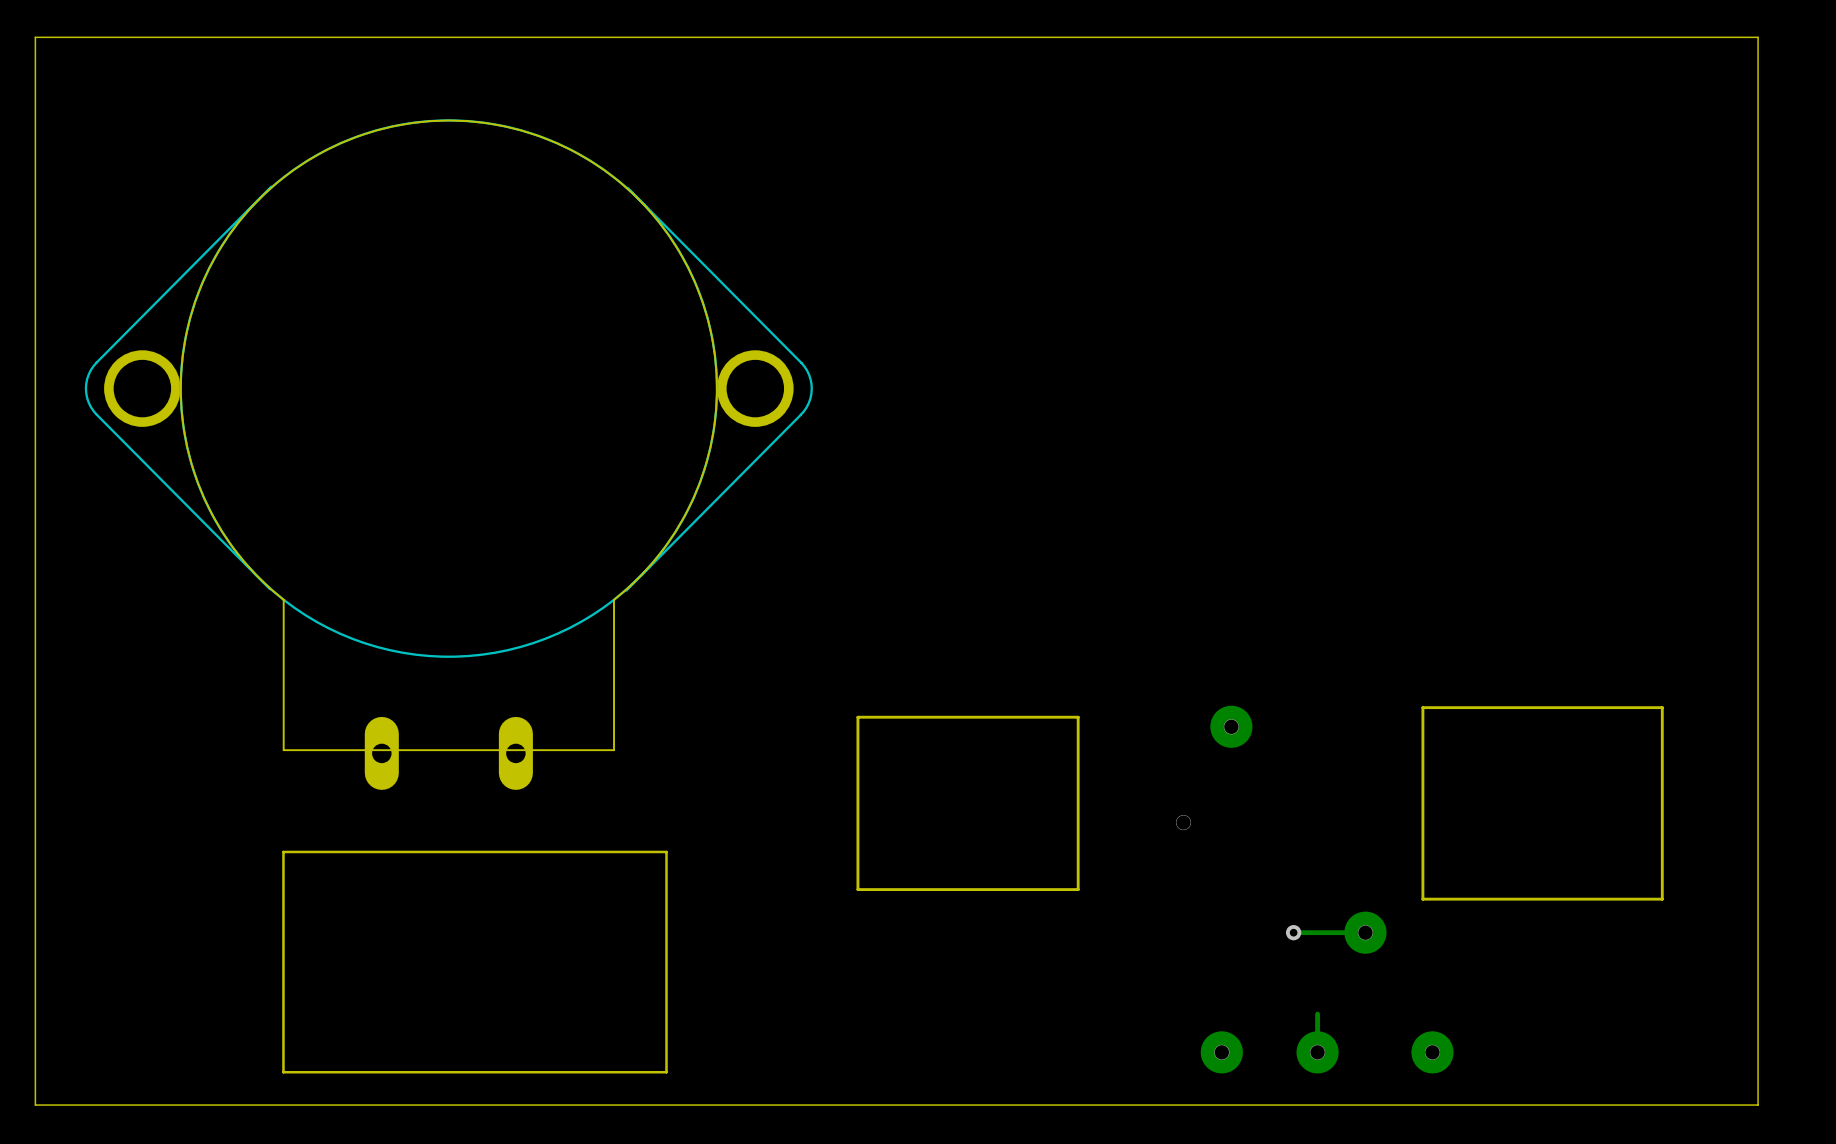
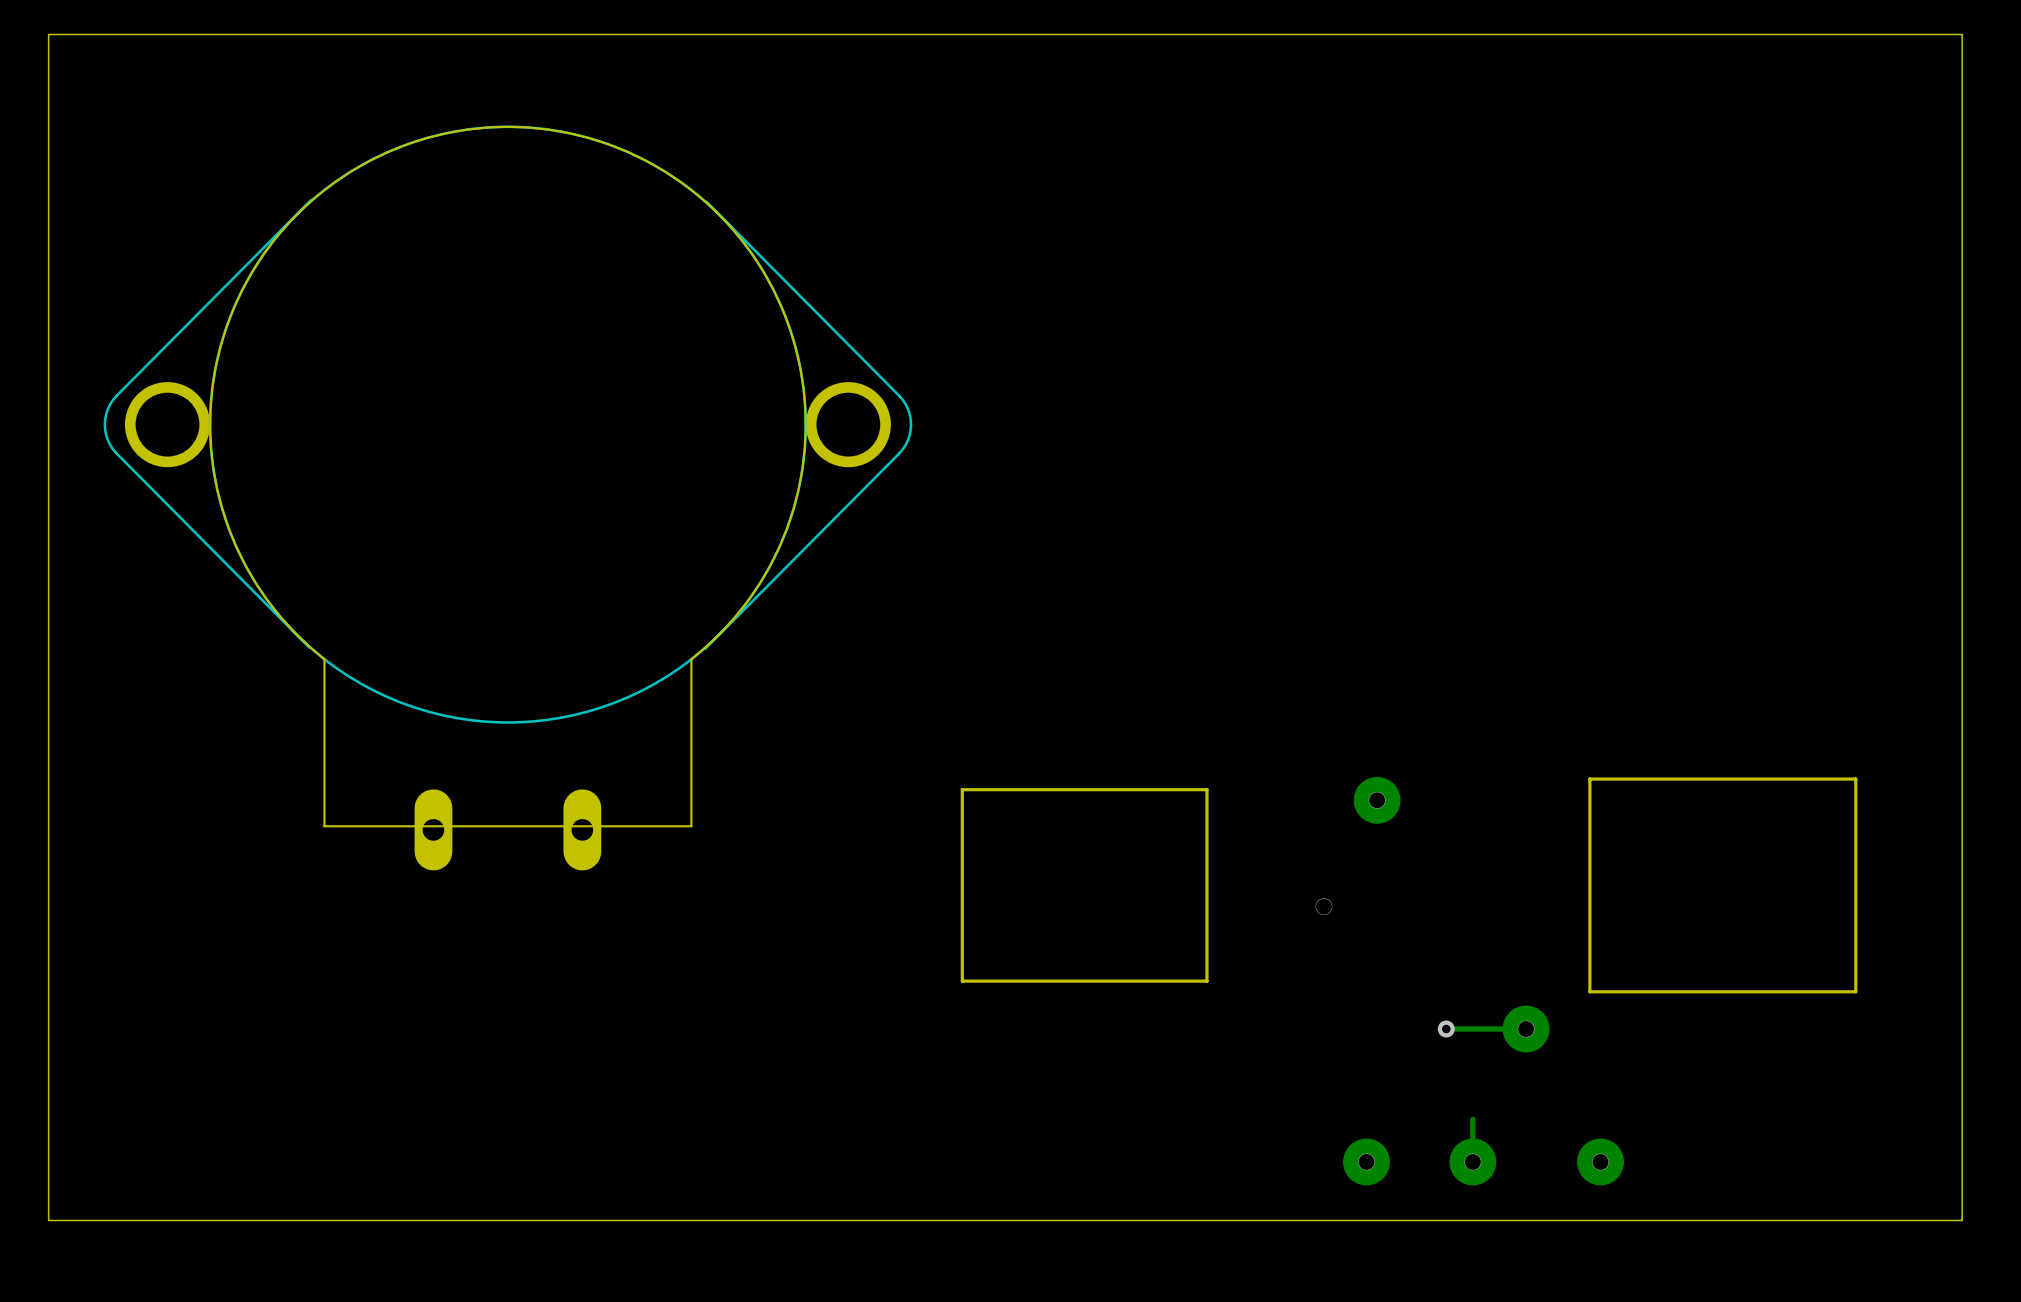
drawing: [282, 850, 668, 1074] -> none

